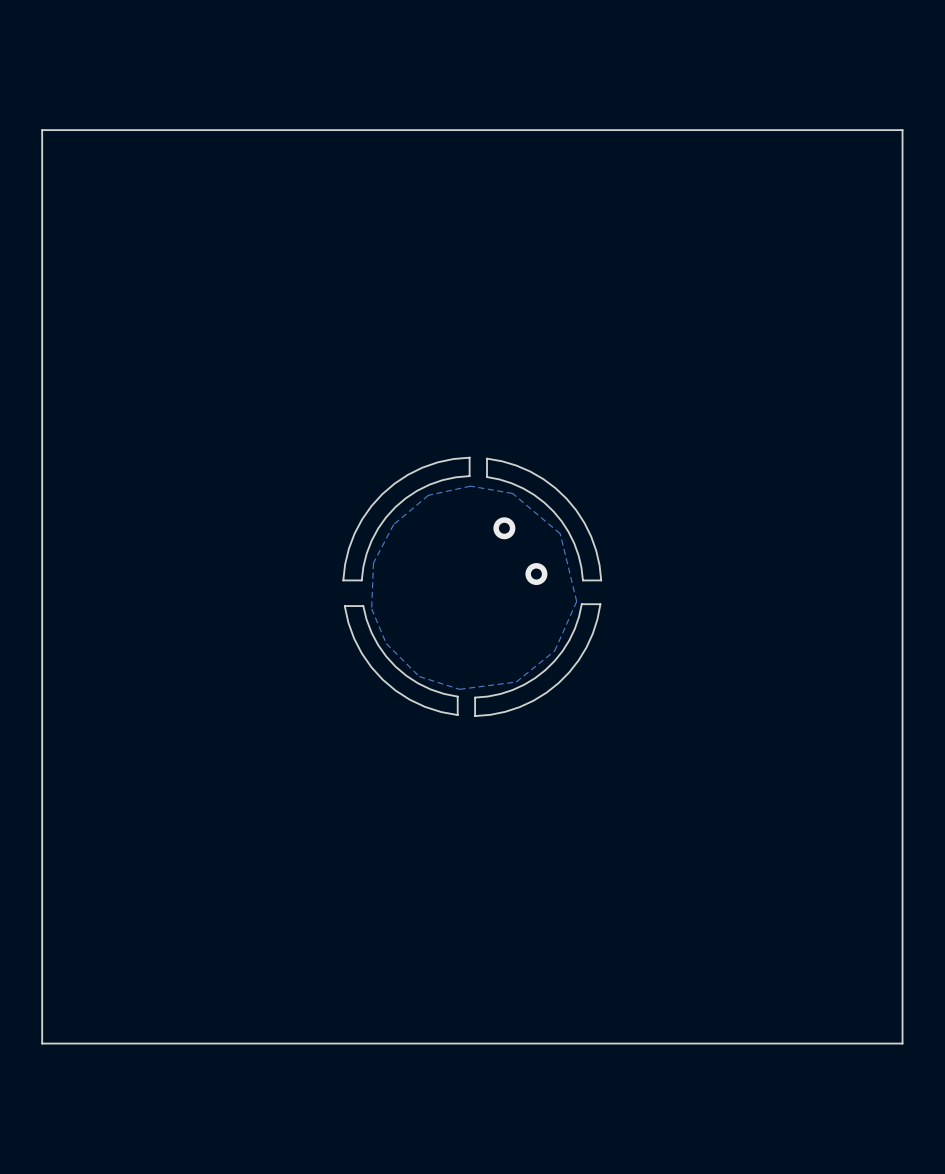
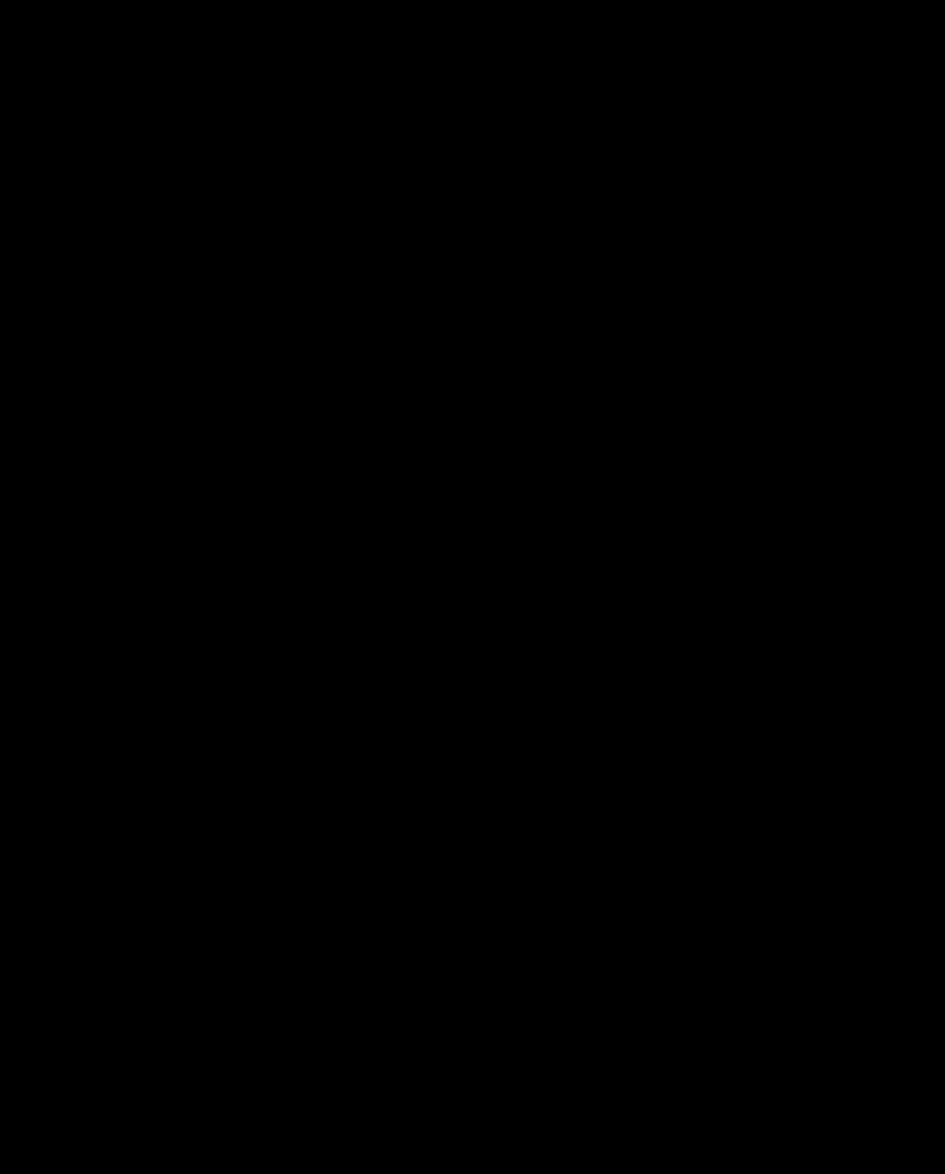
board edge: (902, 130) (42, 130) (42, 1043) (902, 1043) (902, 130) -> none
board edge: (487, 458) (487, 477) (523, 488) (544, 502) (561, 521) (578, 555) (582, 580) (601, 580) (599, 565) (591, 536) (584, 522) (566, 498) (555, 488) (530, 471) (501, 461) (487, 458) -> none
board edge: (469, 476) (442, 480) (417, 490) (405, 498) (386, 517) (371, 540) (363, 566) (361, 580) (343, 580) (345, 564) (354, 533) (371, 506) (394, 483) (422, 467) (453, 459) (469, 457) (469, 476) -> none
zone outline: (470, 486) (512, 493) (560, 533) (576, 601) (554, 650) (516, 682) (459, 689) (419, 676) (386, 643) (371, 608) (373, 563) (393, 524) (428, 495) (470, 486) -> none
via: (504, 528) -> none
via: (536, 574) -> none
board edge: (345, 606) (363, 606) (366, 619) (378, 645) (386, 656) (406, 675) (430, 689) (457, 696) (457, 715) (425, 706) (409, 699) (382, 679) (371, 667) (354, 638) (344, 606) -> none
board edge: (475, 716) (490, 714) (519, 707) (533, 700) (558, 683) (578, 660) (586, 647) (597, 619) (600, 604) (581, 604) (569, 640) (554, 661) (535, 678) (512, 690) (475, 697) (475, 716) -> none

